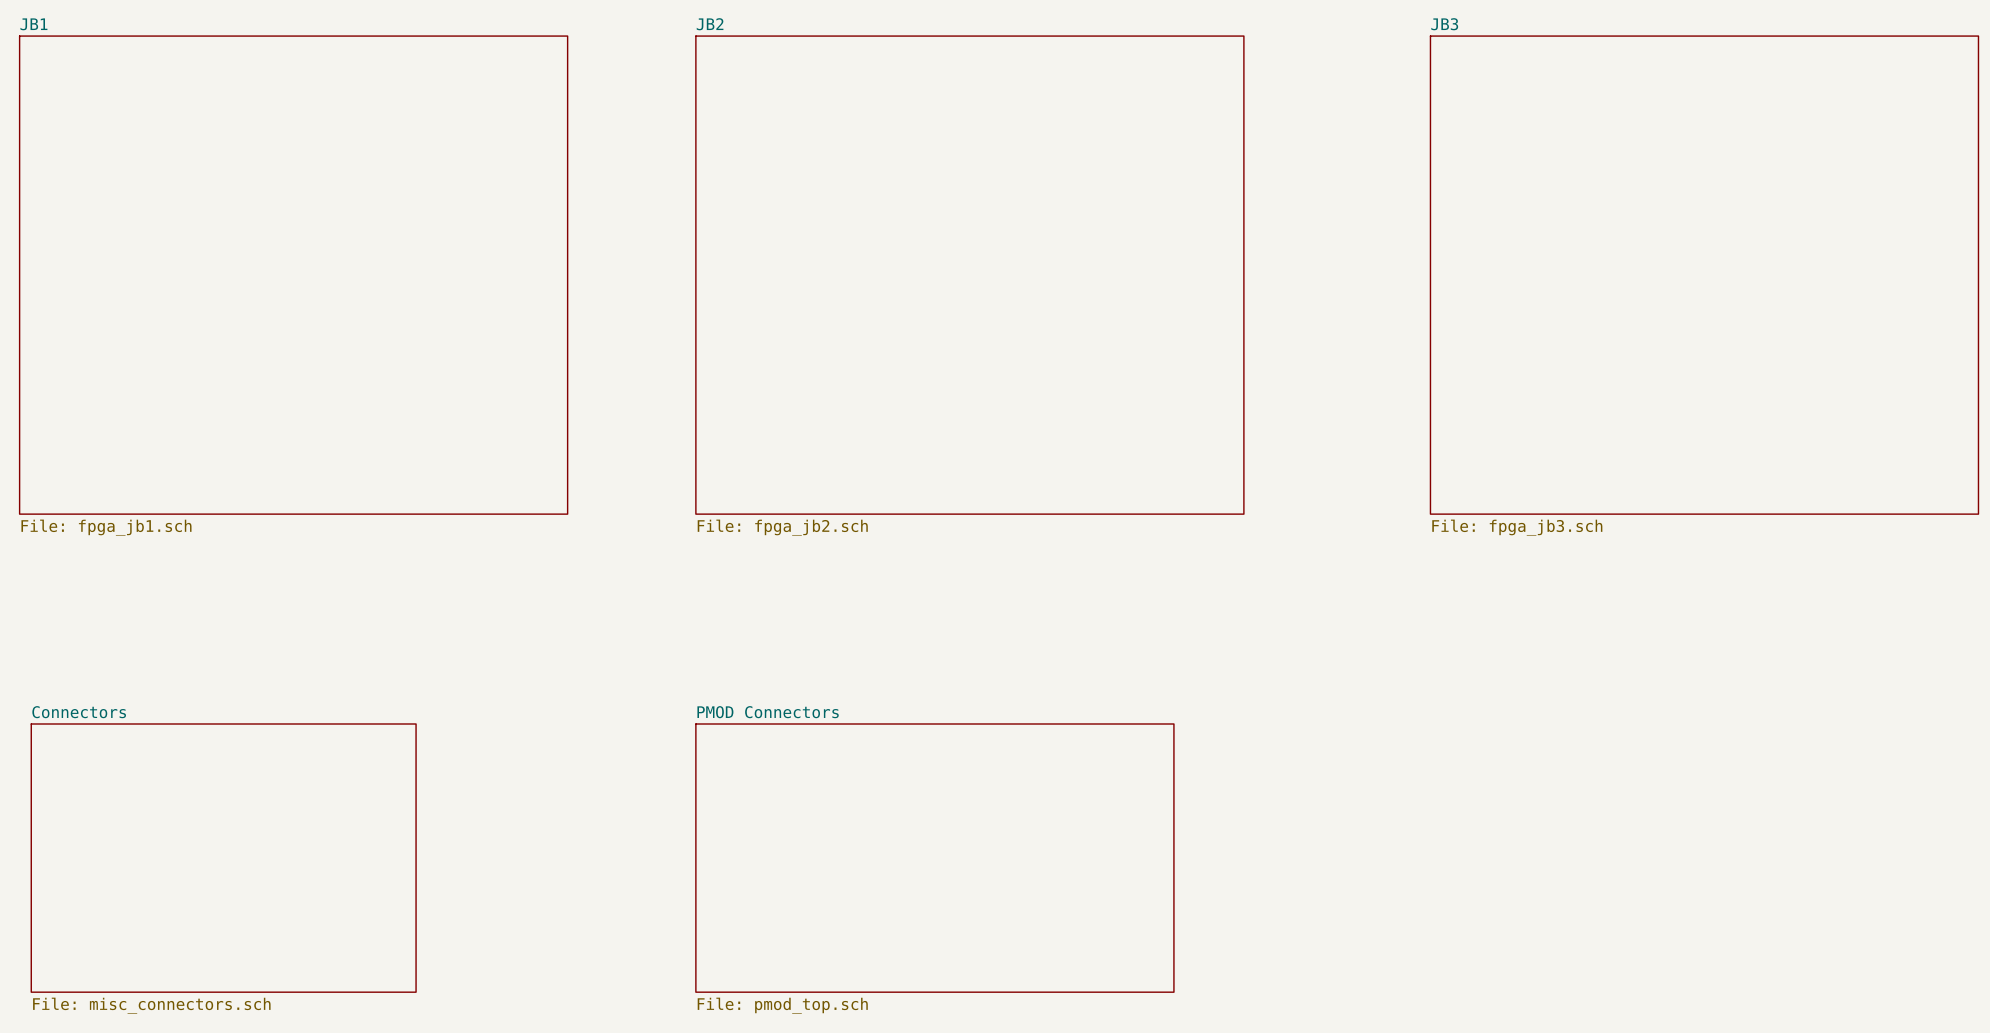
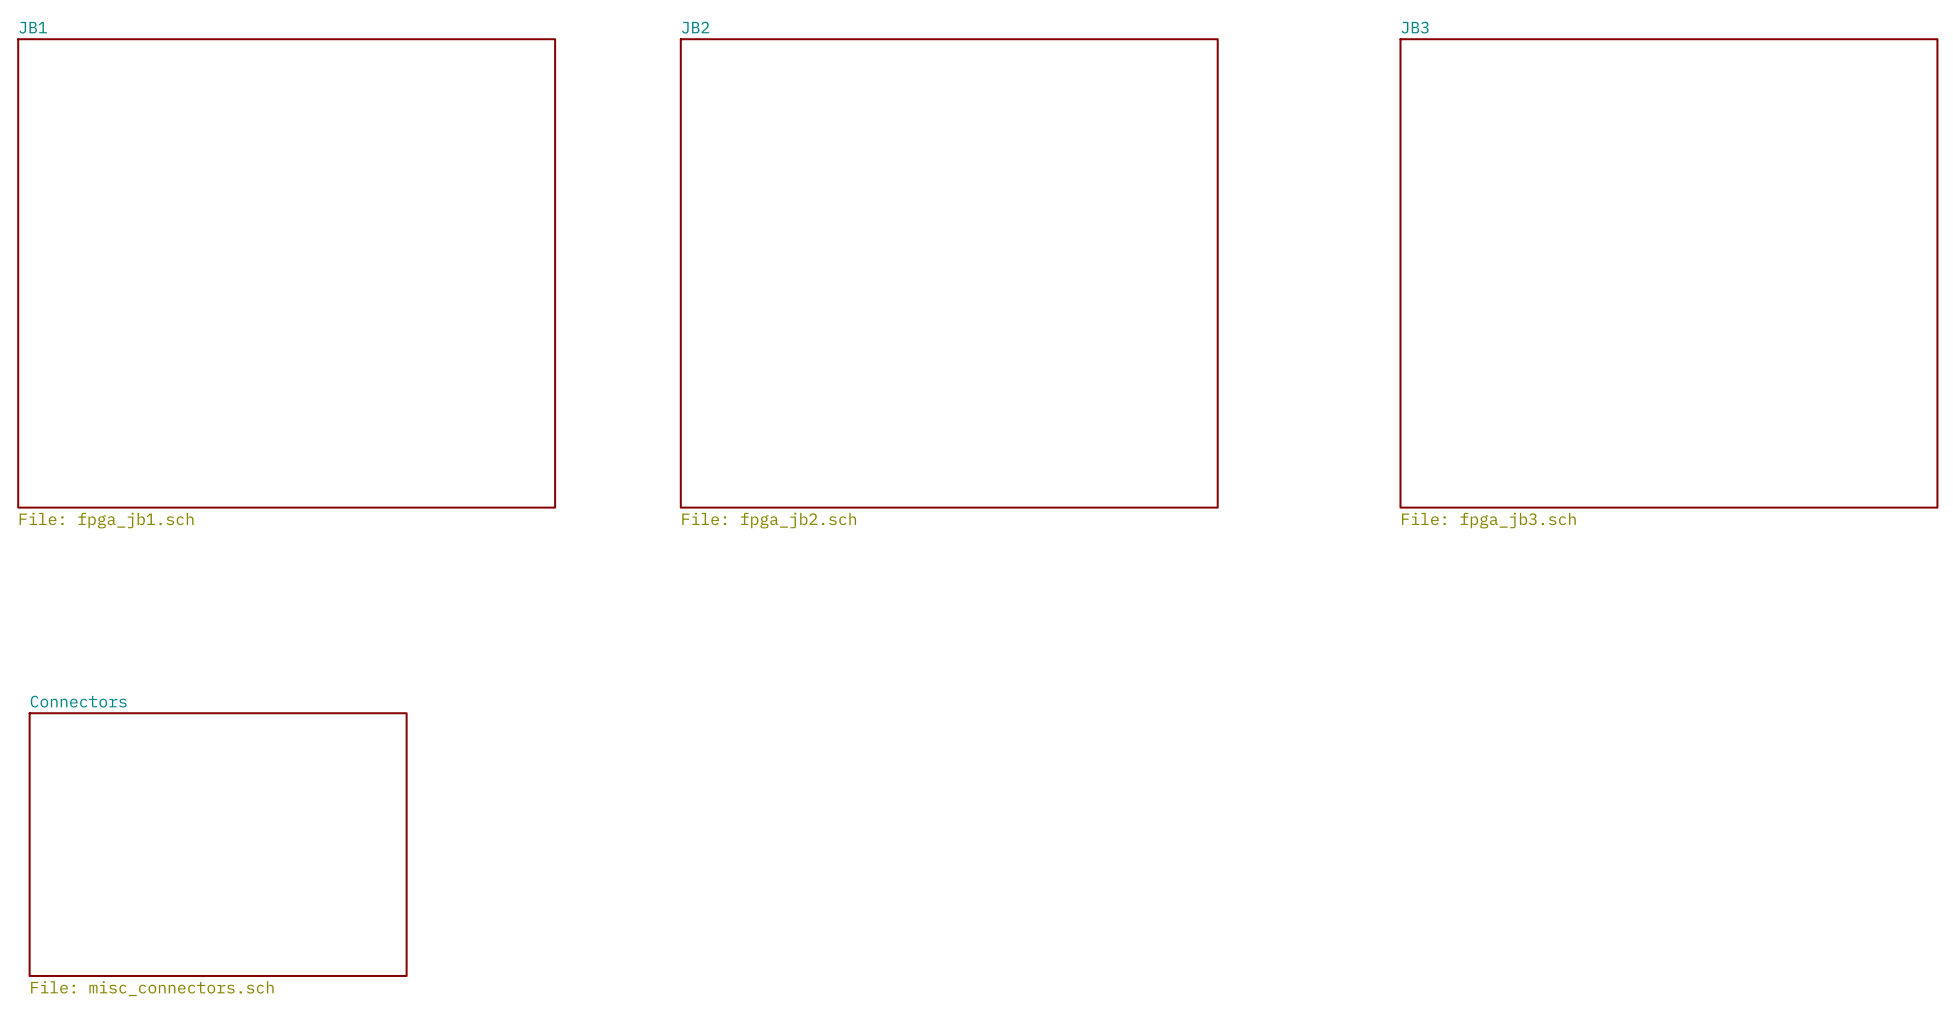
sheet PMOD Connectors: File: pmod_top.sch (934, 858) -> none

